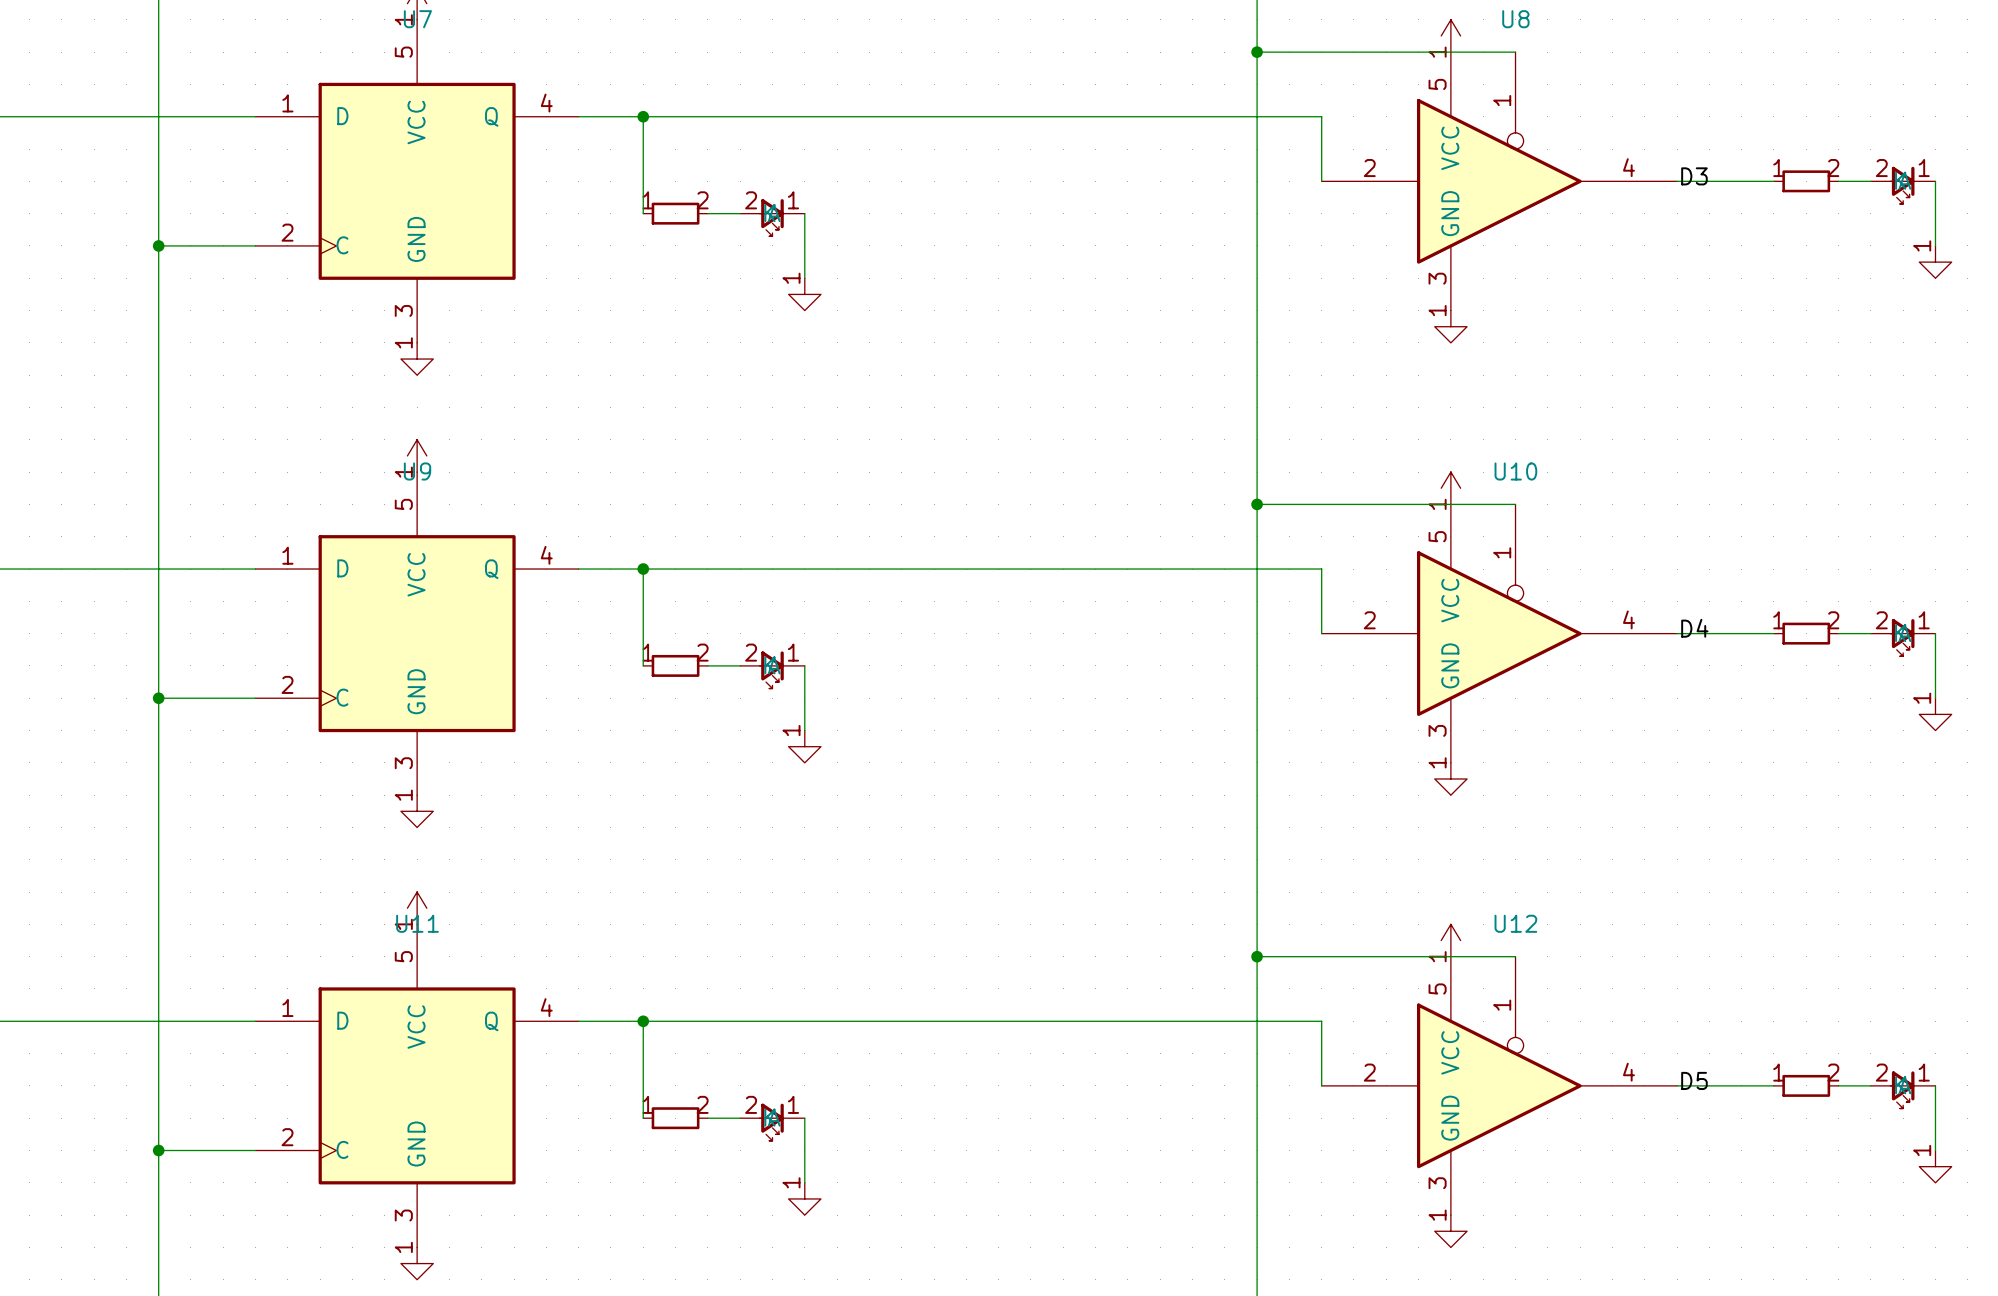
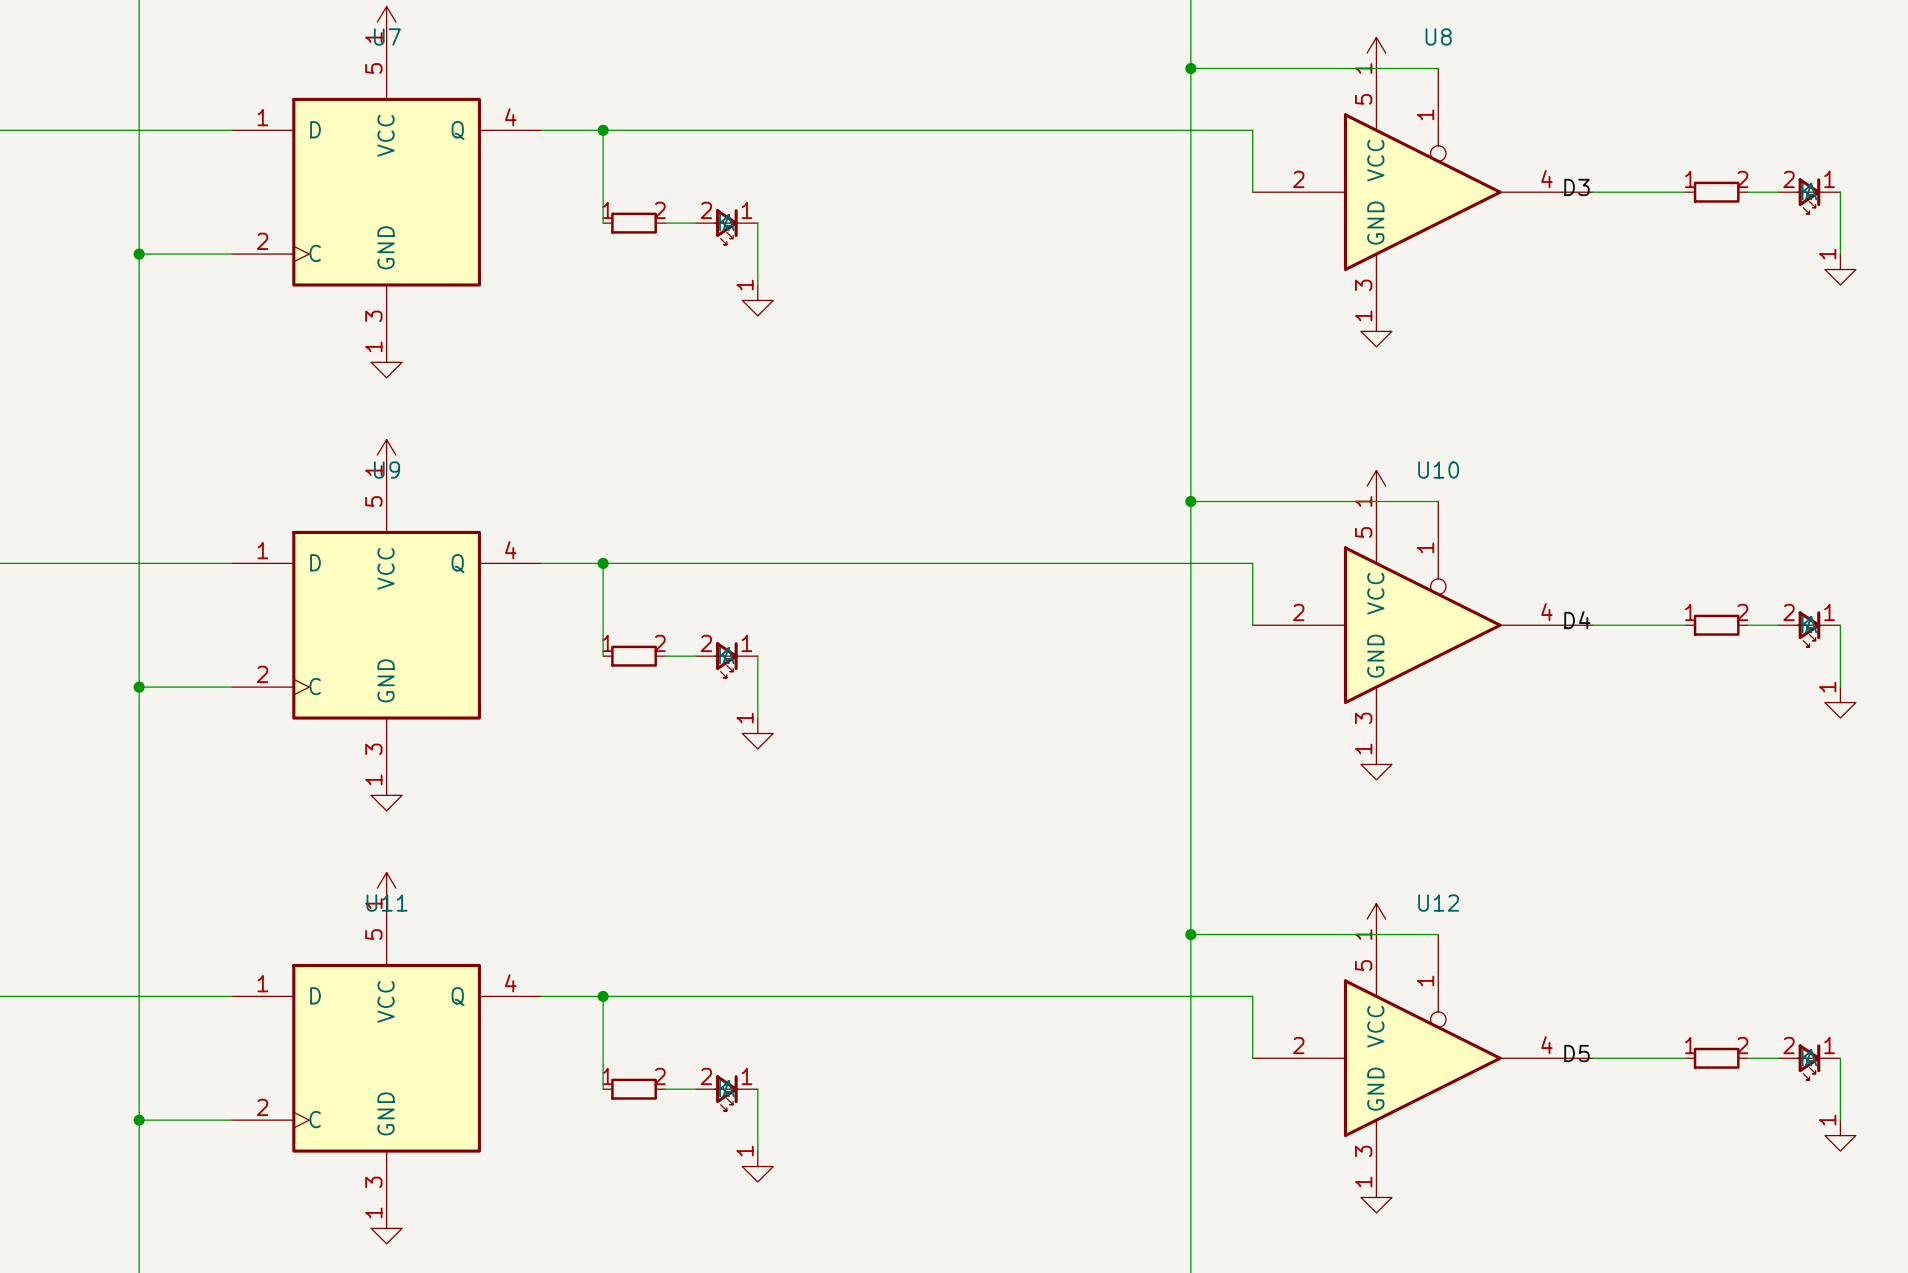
label position: D3 (1694, 176) -> D3 (1576, 187)
label position: D4 (1694, 628) -> D4 (1577, 620)
label position: D5 (1694, 1080) -> D5 (1576, 1053)

